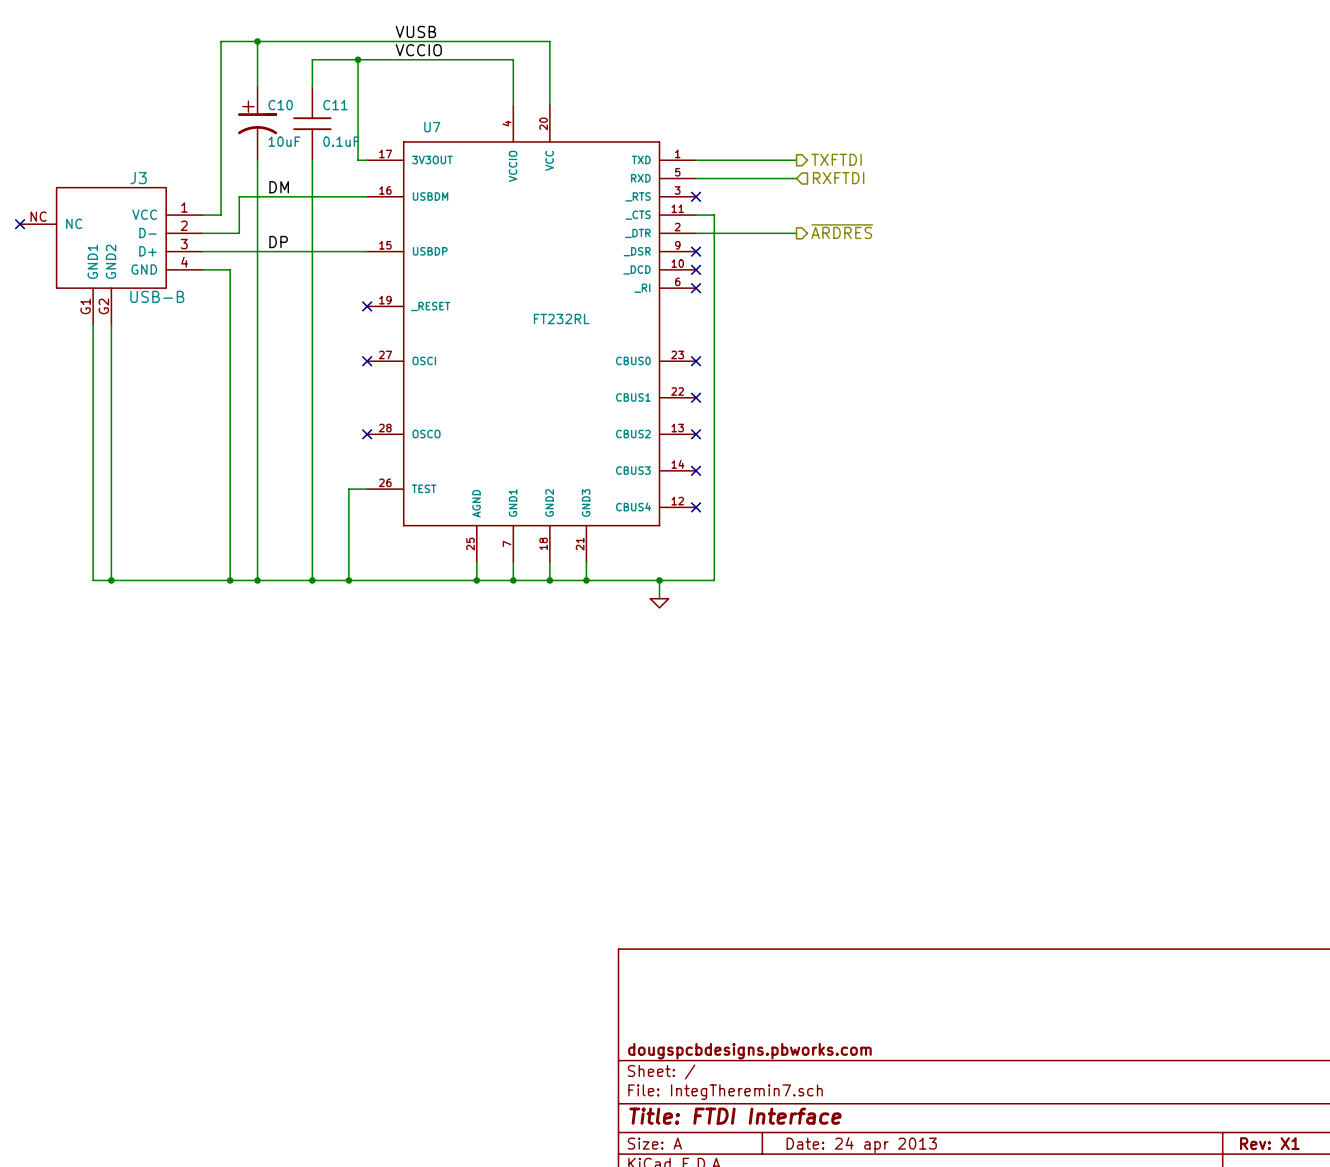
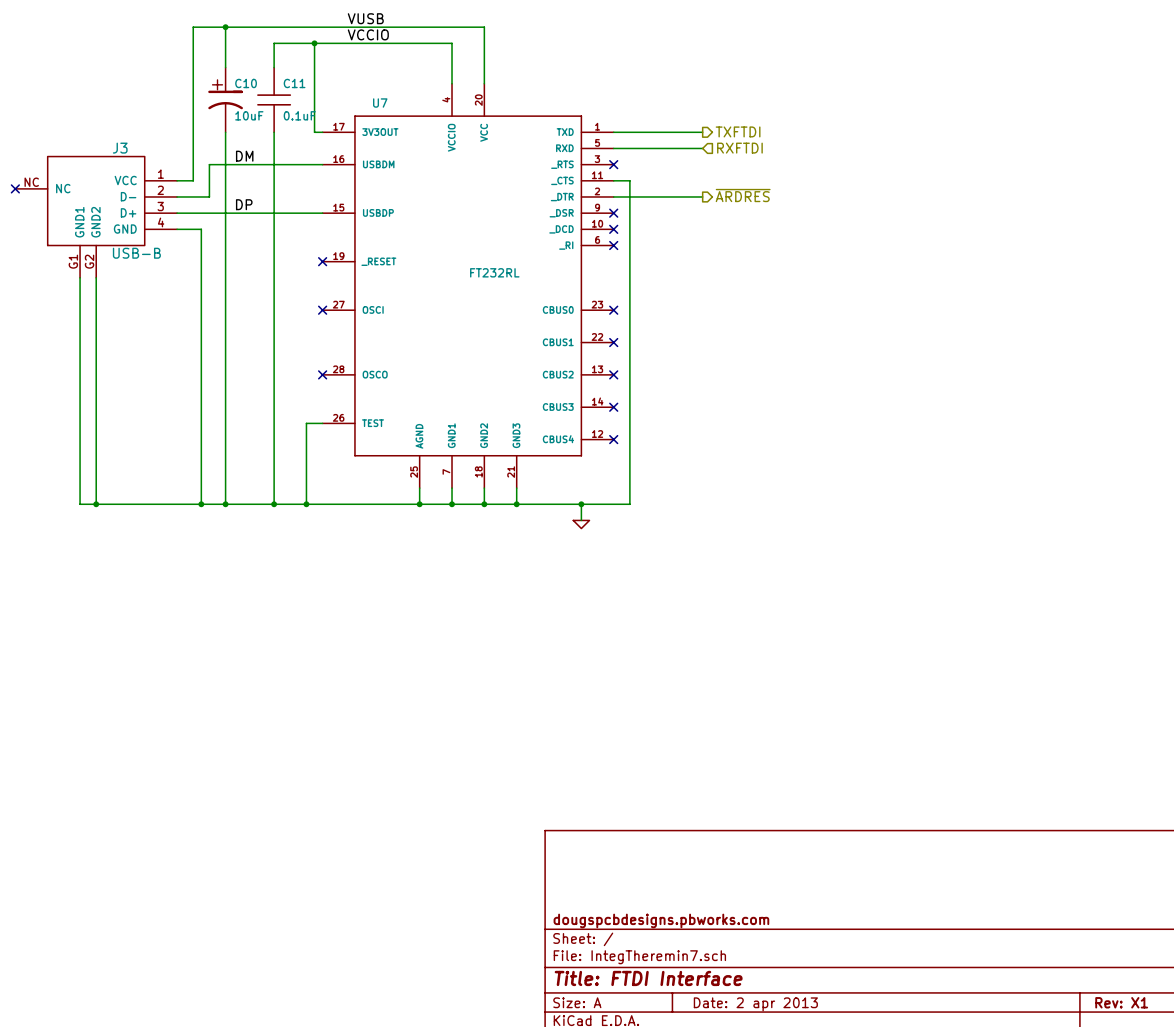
title block: Date: 24 apr 2013 (861, 1145) -> Date: 2 apr 2013 (755, 1004)

